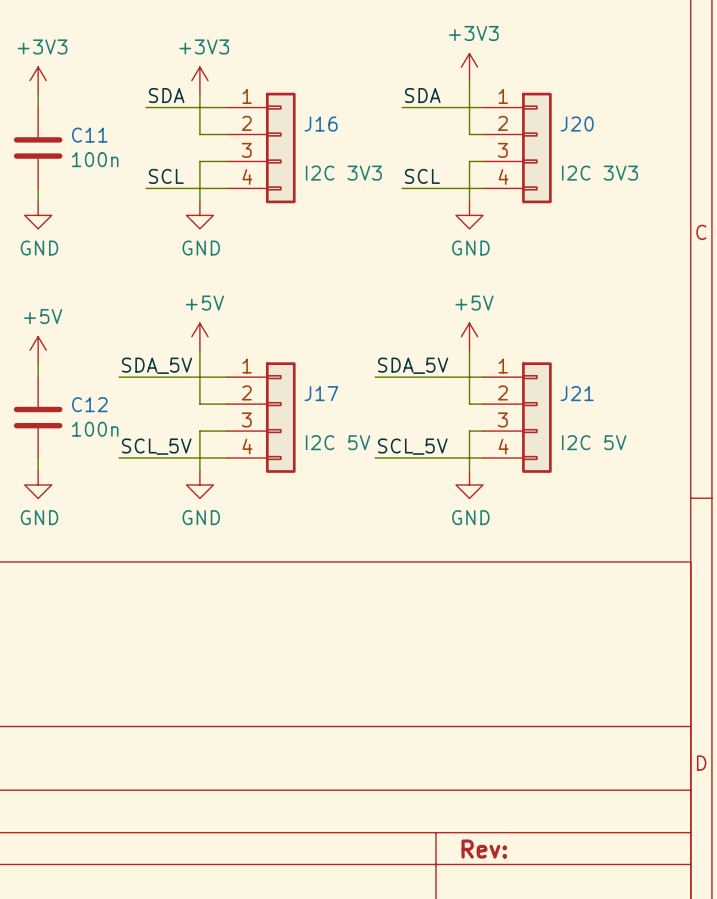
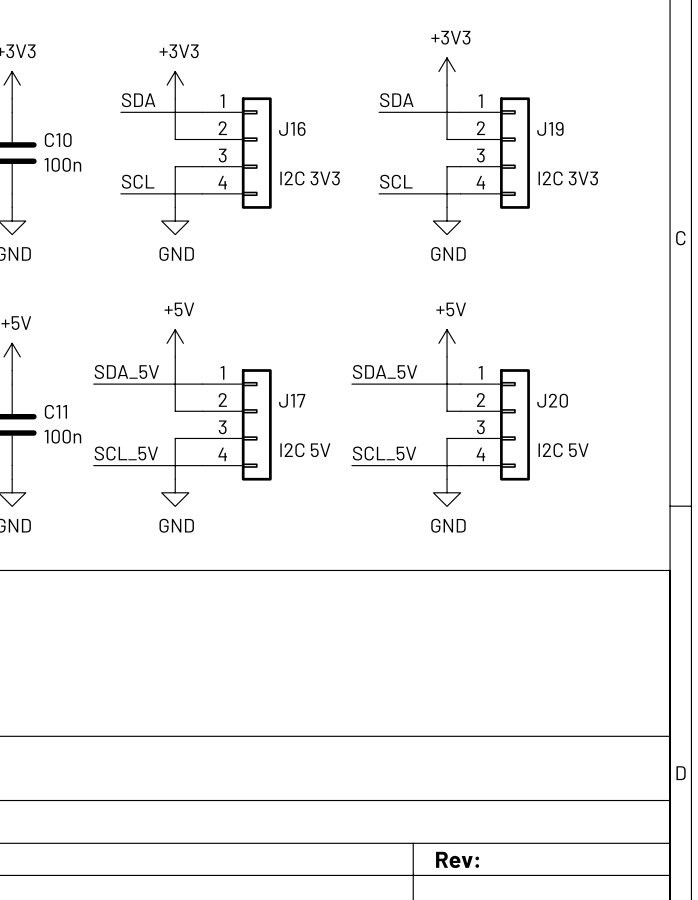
J20 name: J20 (577, 124) -> J19 (550, 128)
C11 name: C11 (89, 135) -> C10 (58, 140)
J21 name: J21 (577, 393) -> J20 (552, 400)
C12 name: C12 (89, 404) -> C11 (55, 411)

